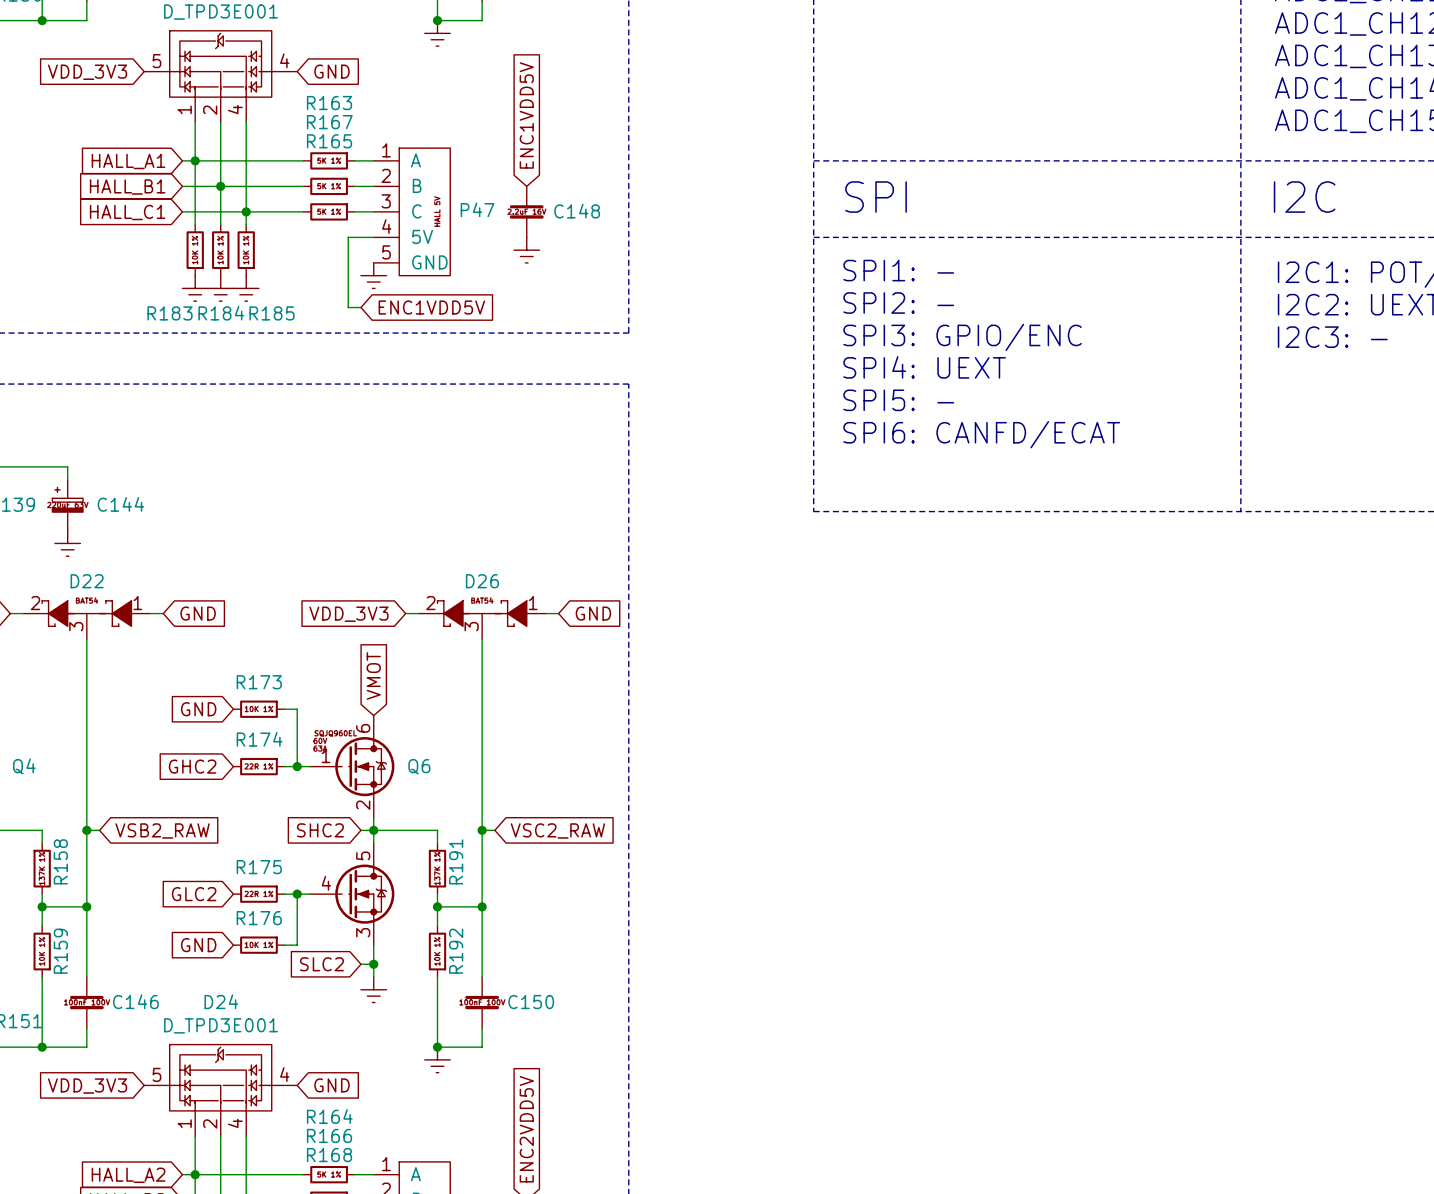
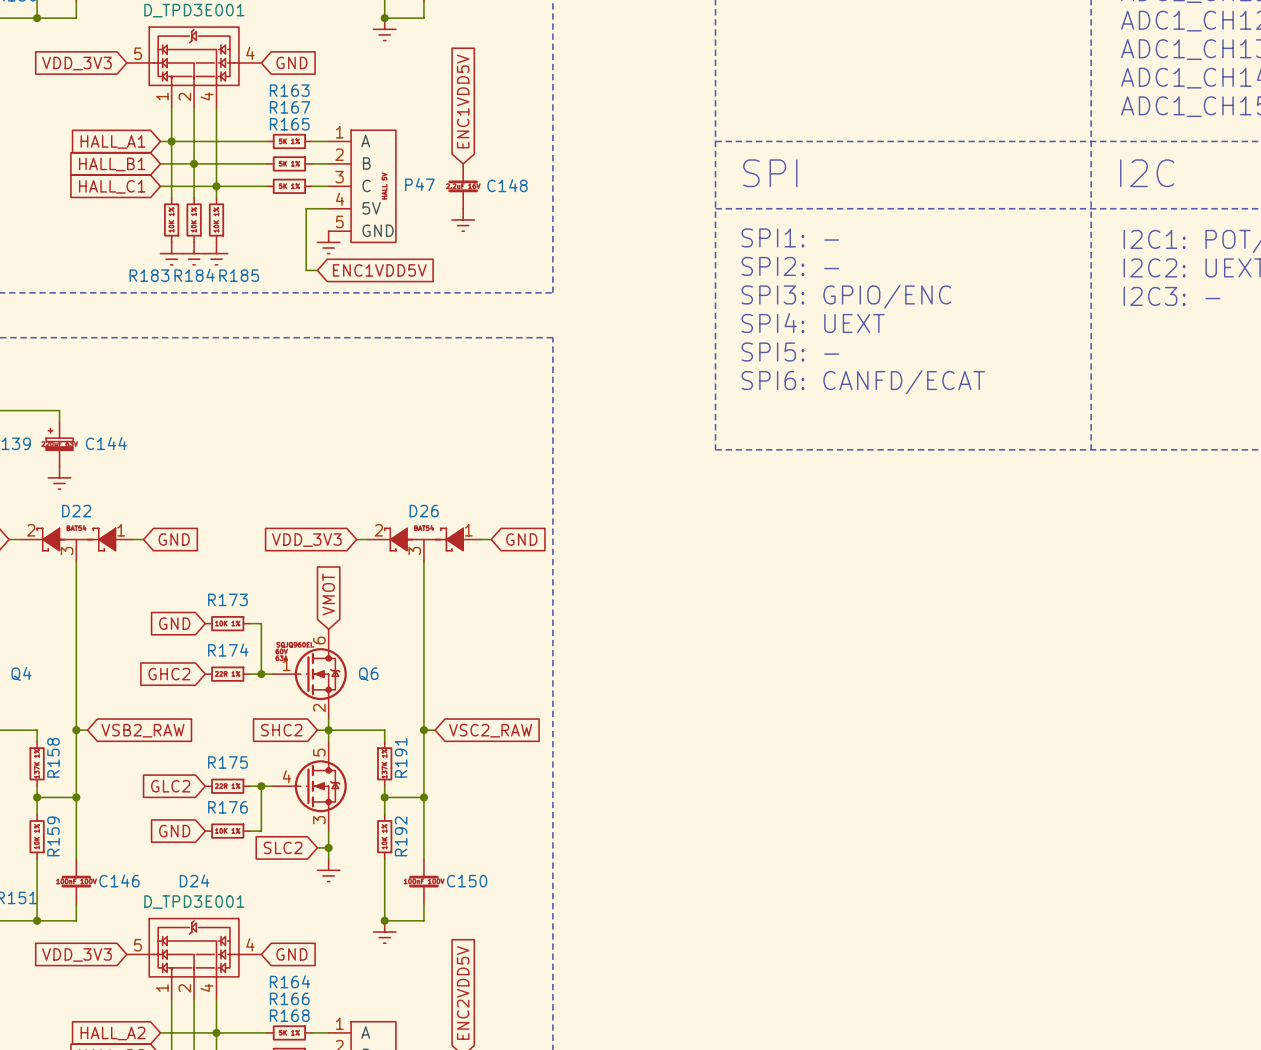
junction position: (195, 1174) -> (216, 1032)

